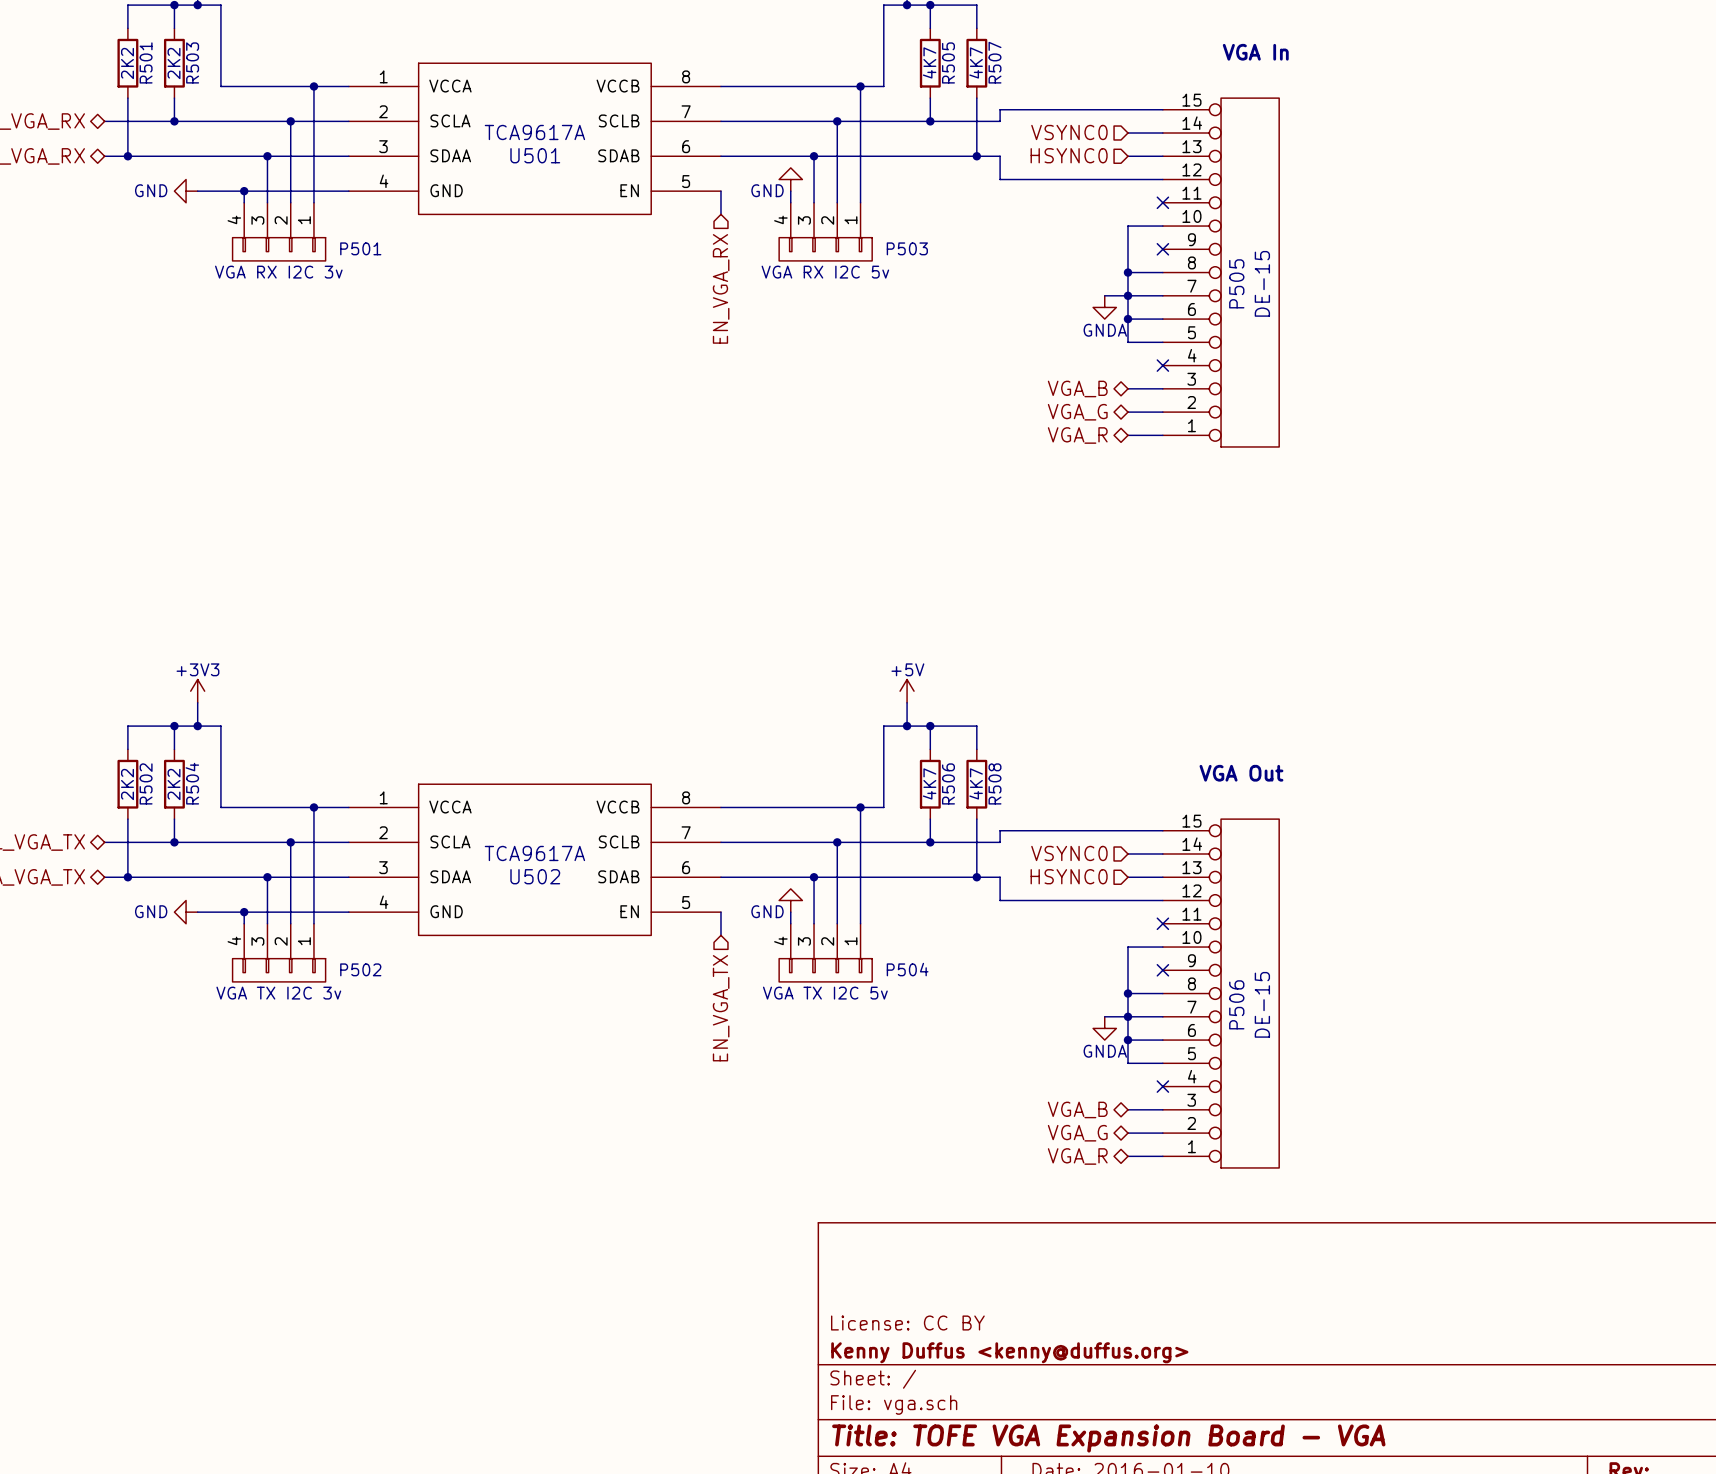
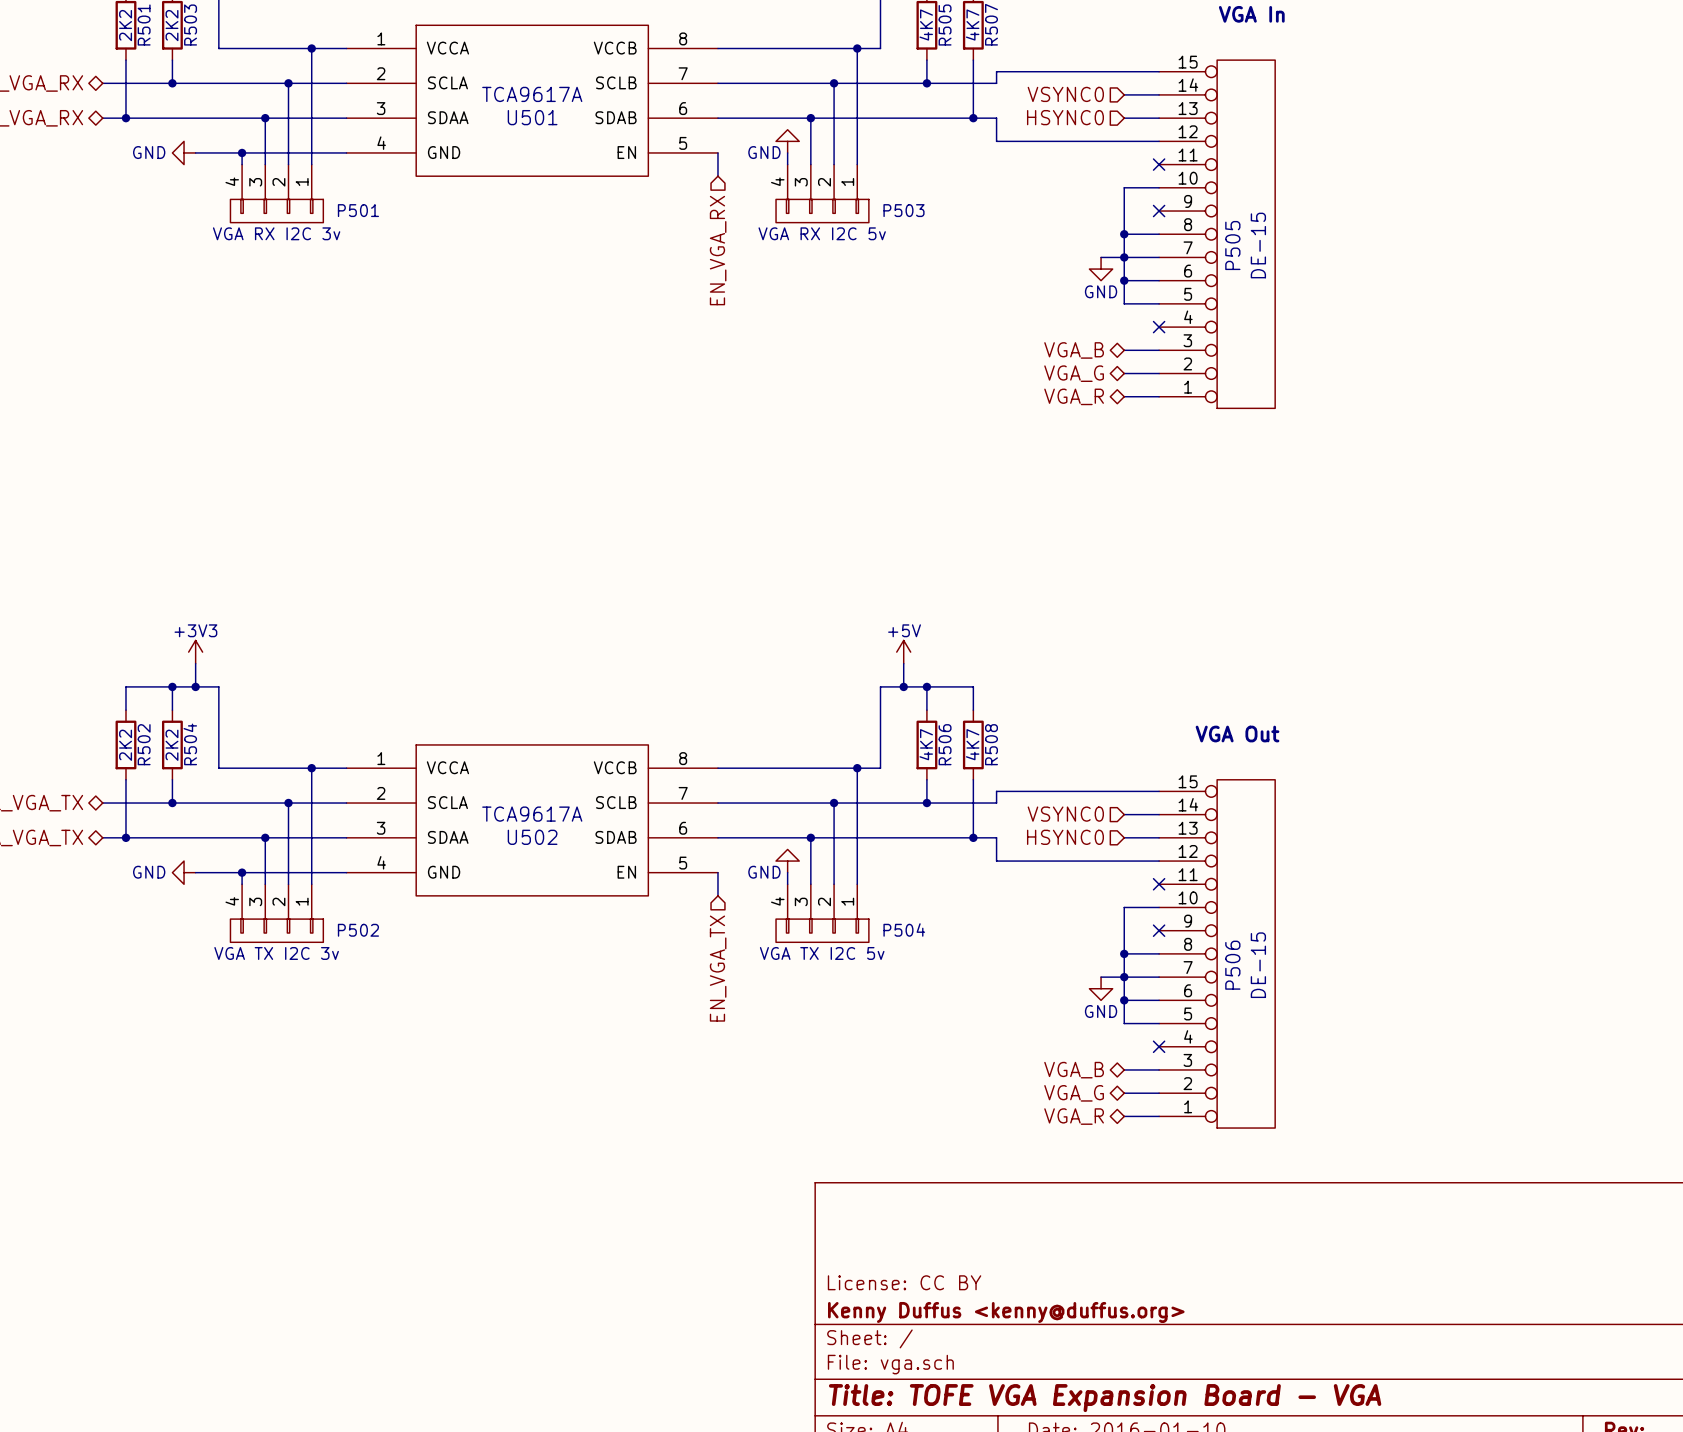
power symbol: GNDA (1104, 307) -> GND (1101, 269)
power symbol: GNDA (1104, 1028) -> GND (1101, 988)

